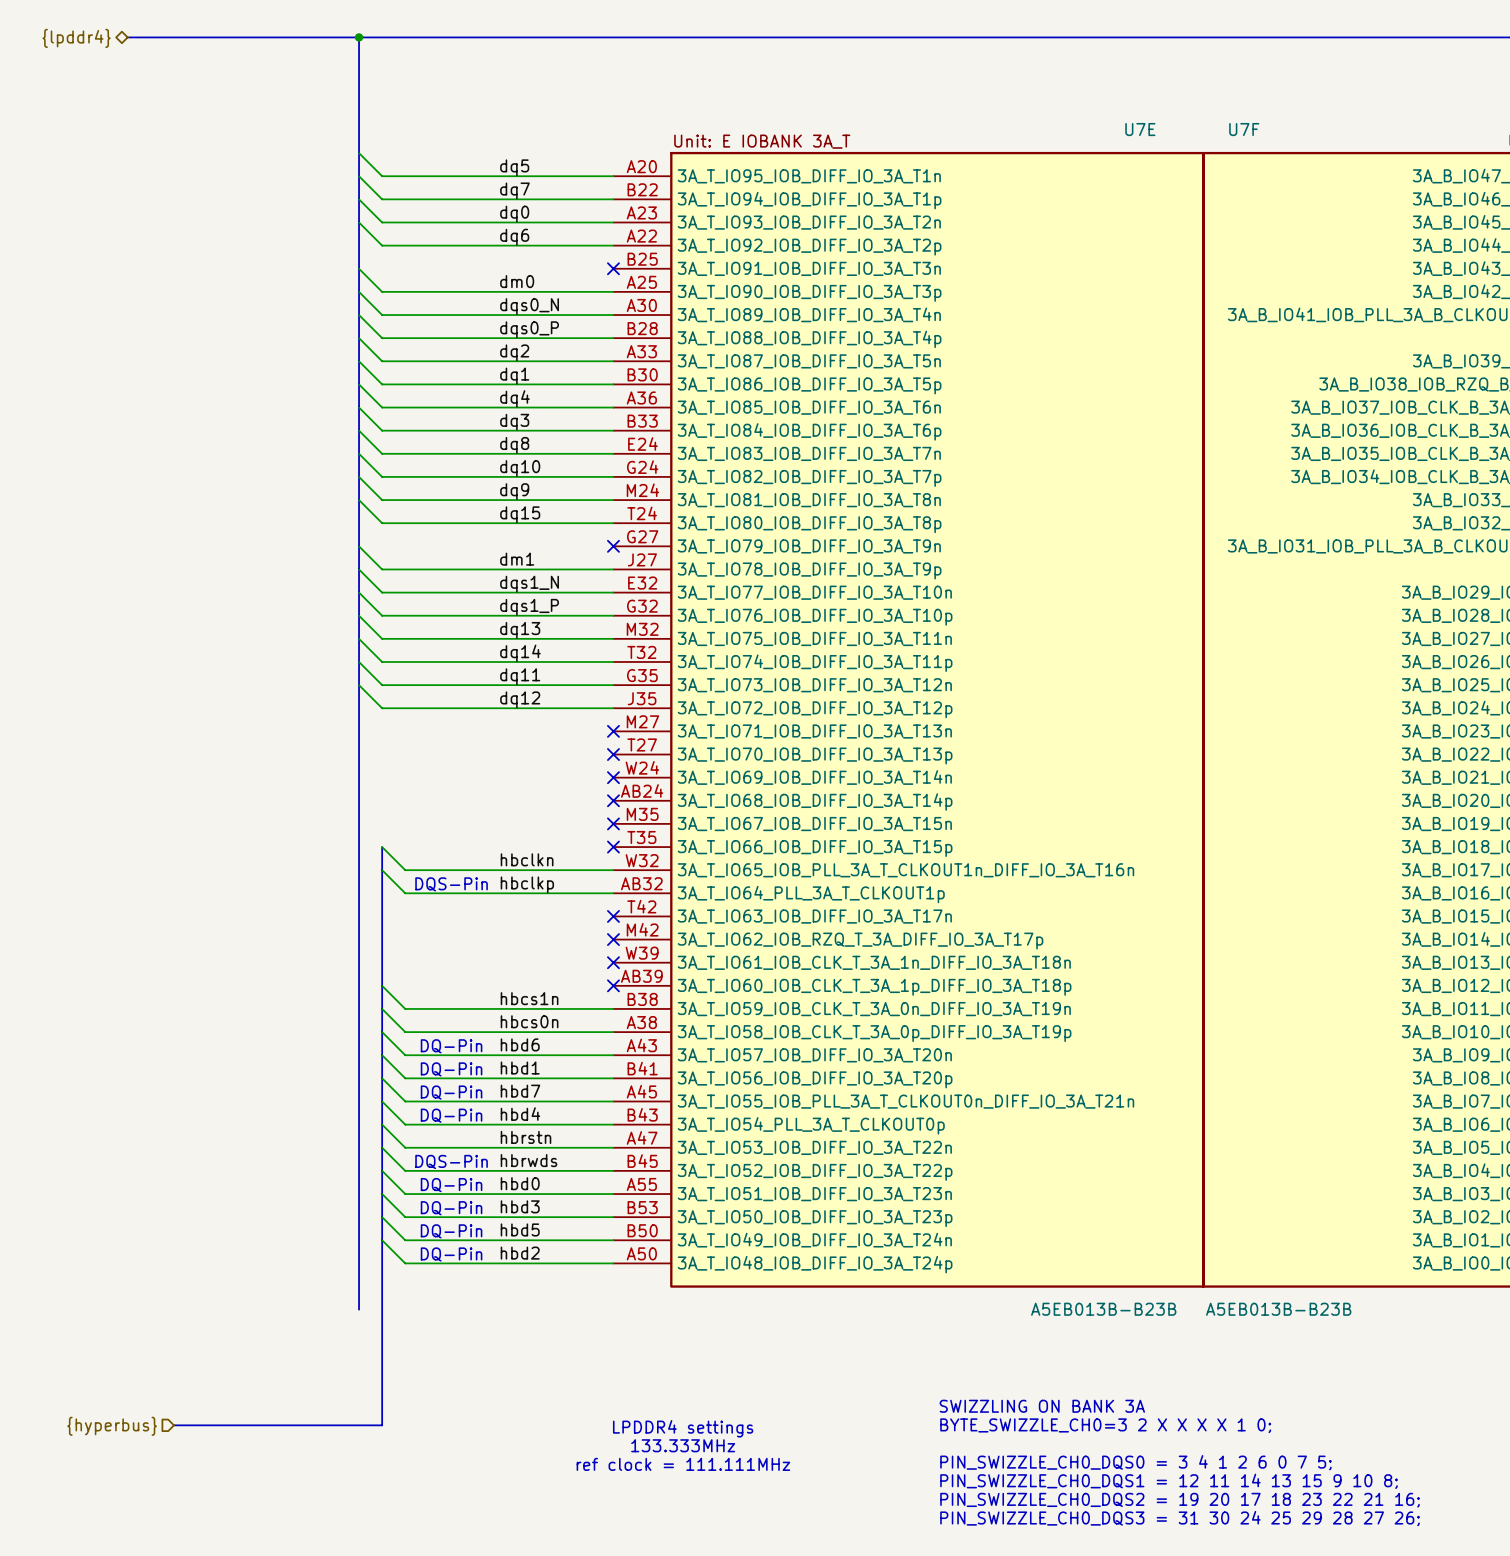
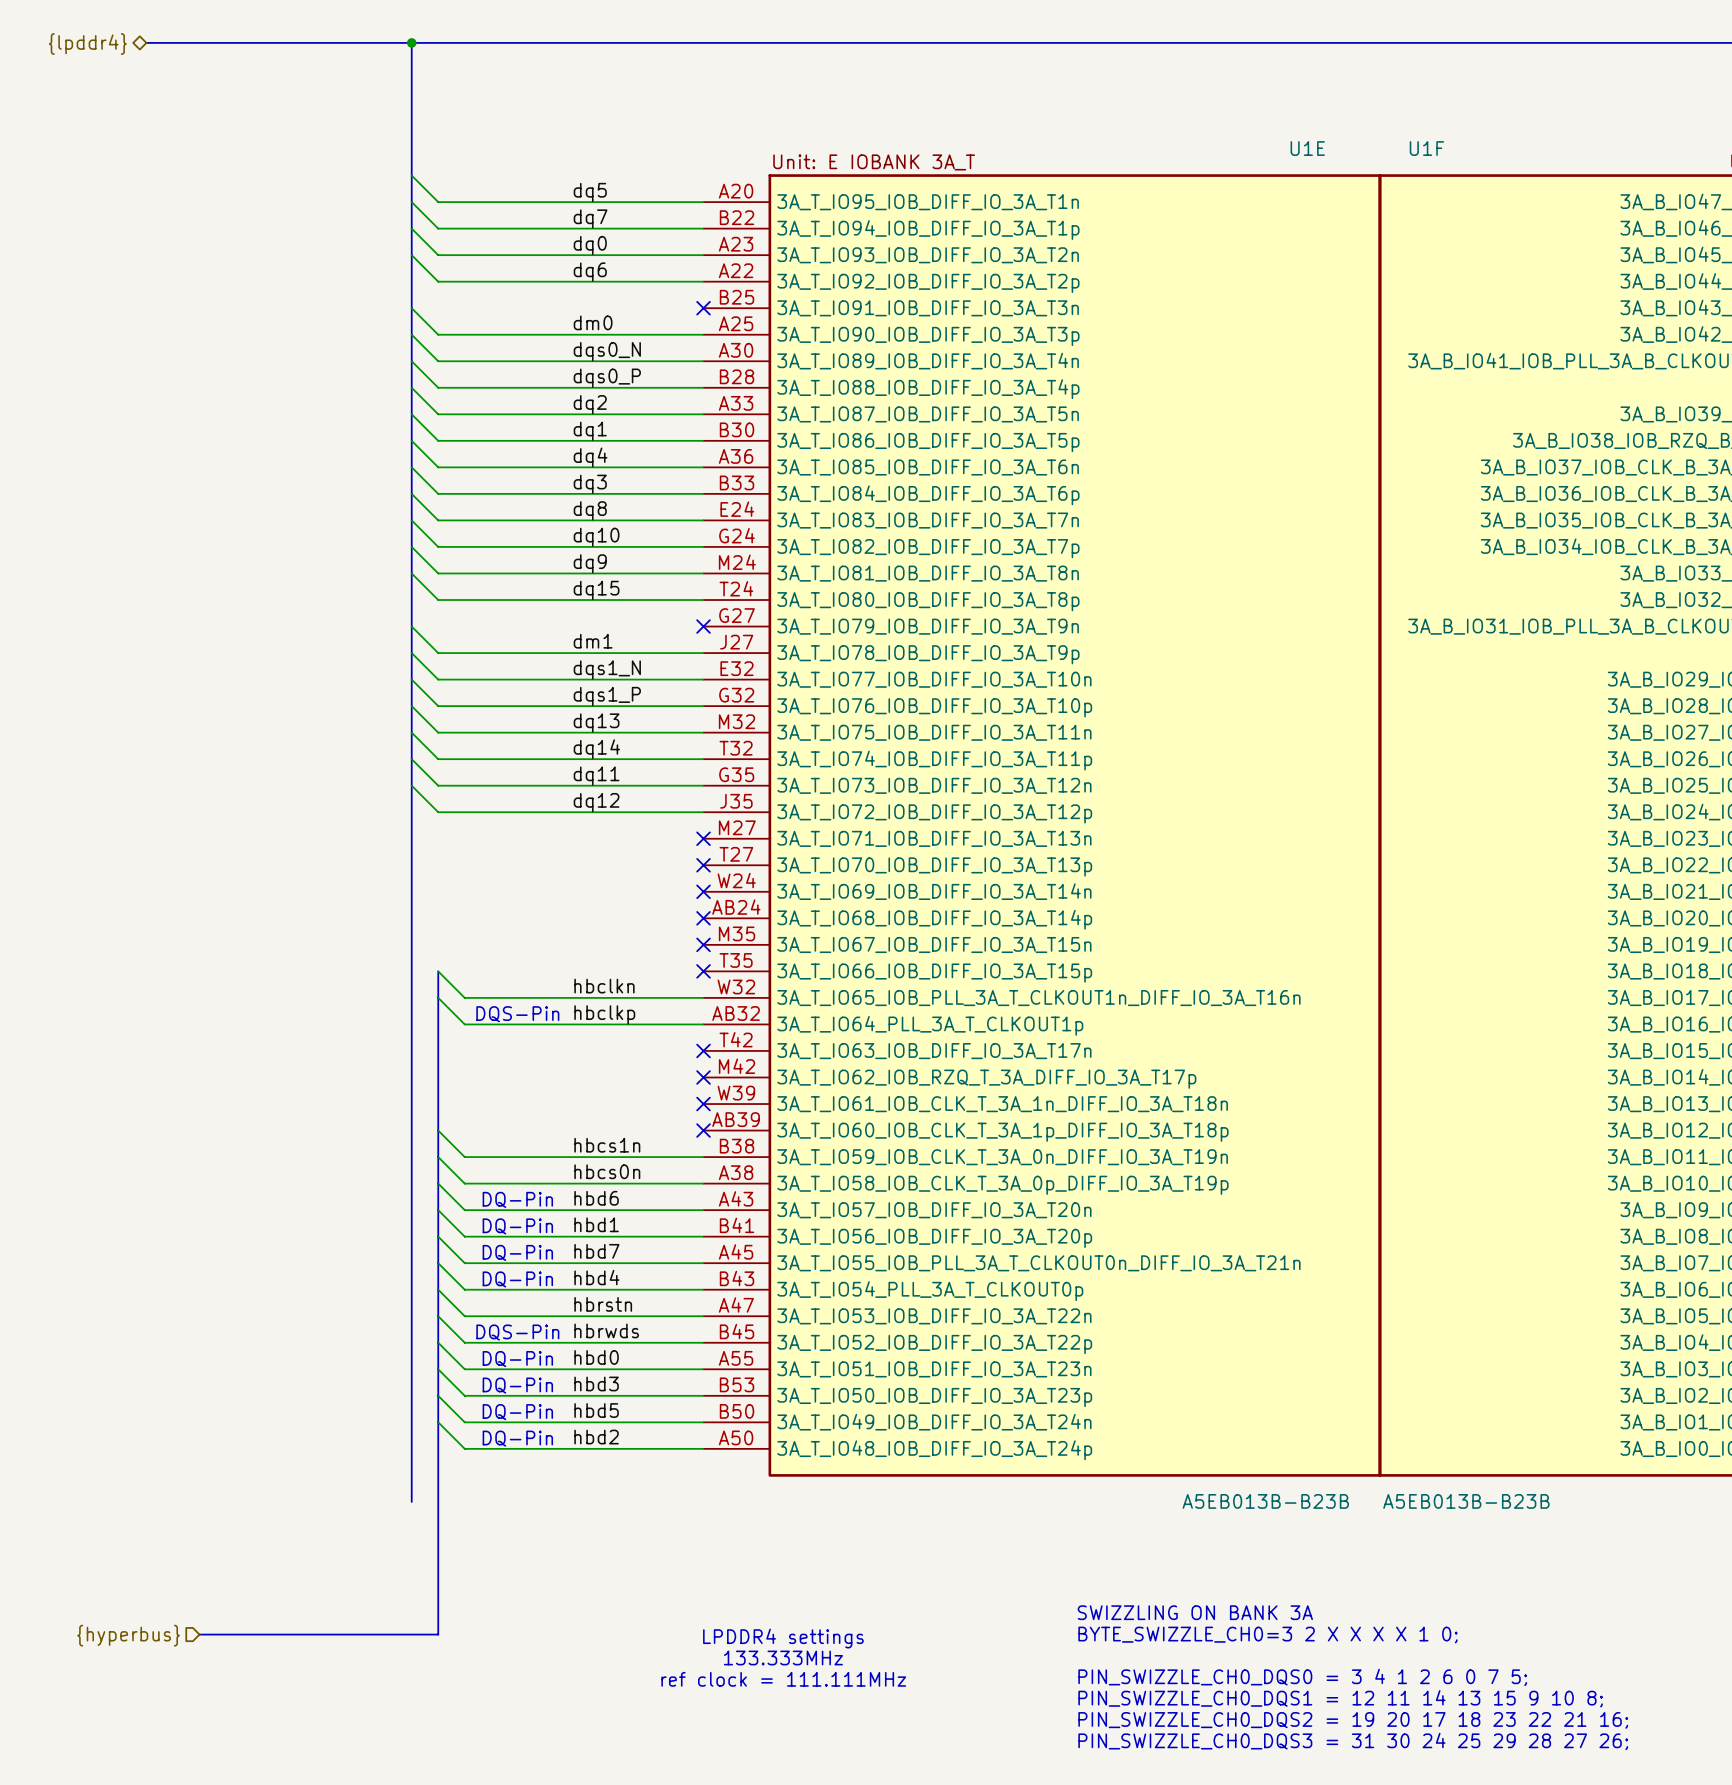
U7E name: U7E (1140, 129) -> U1E (1307, 148)
U7F name: U7F (1244, 129) -> U1F (1426, 148)

